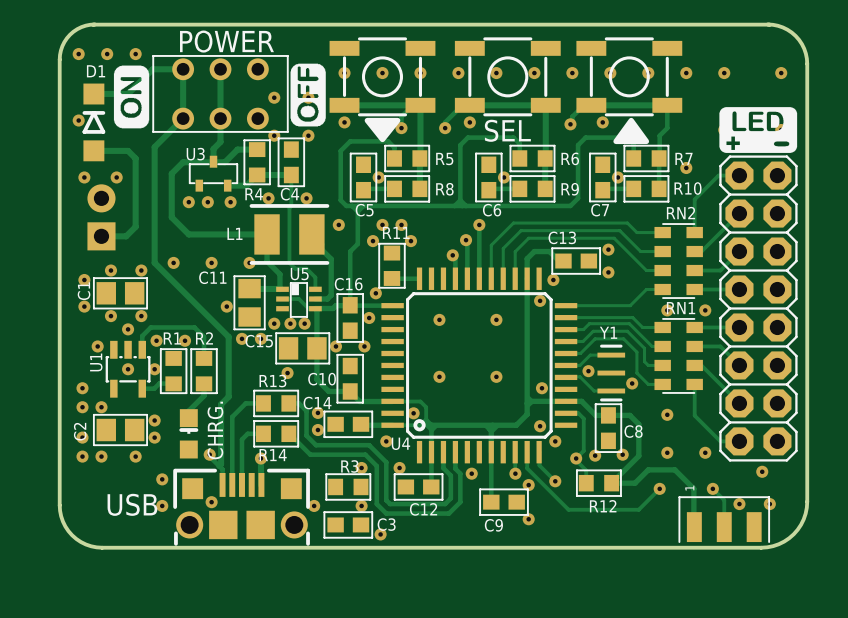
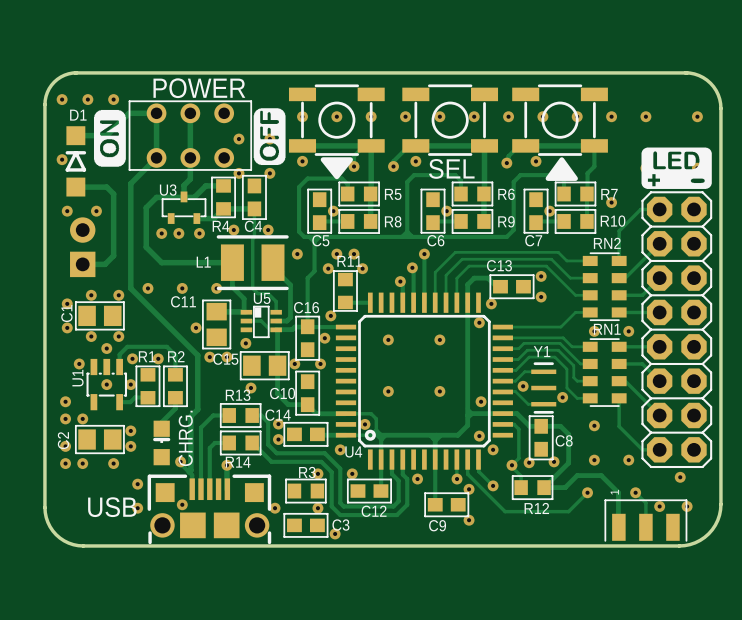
via: (274, 323) -> none
via: none -> (245, 343)
via: (290, 323) -> none
via: (304, 323) -> none

